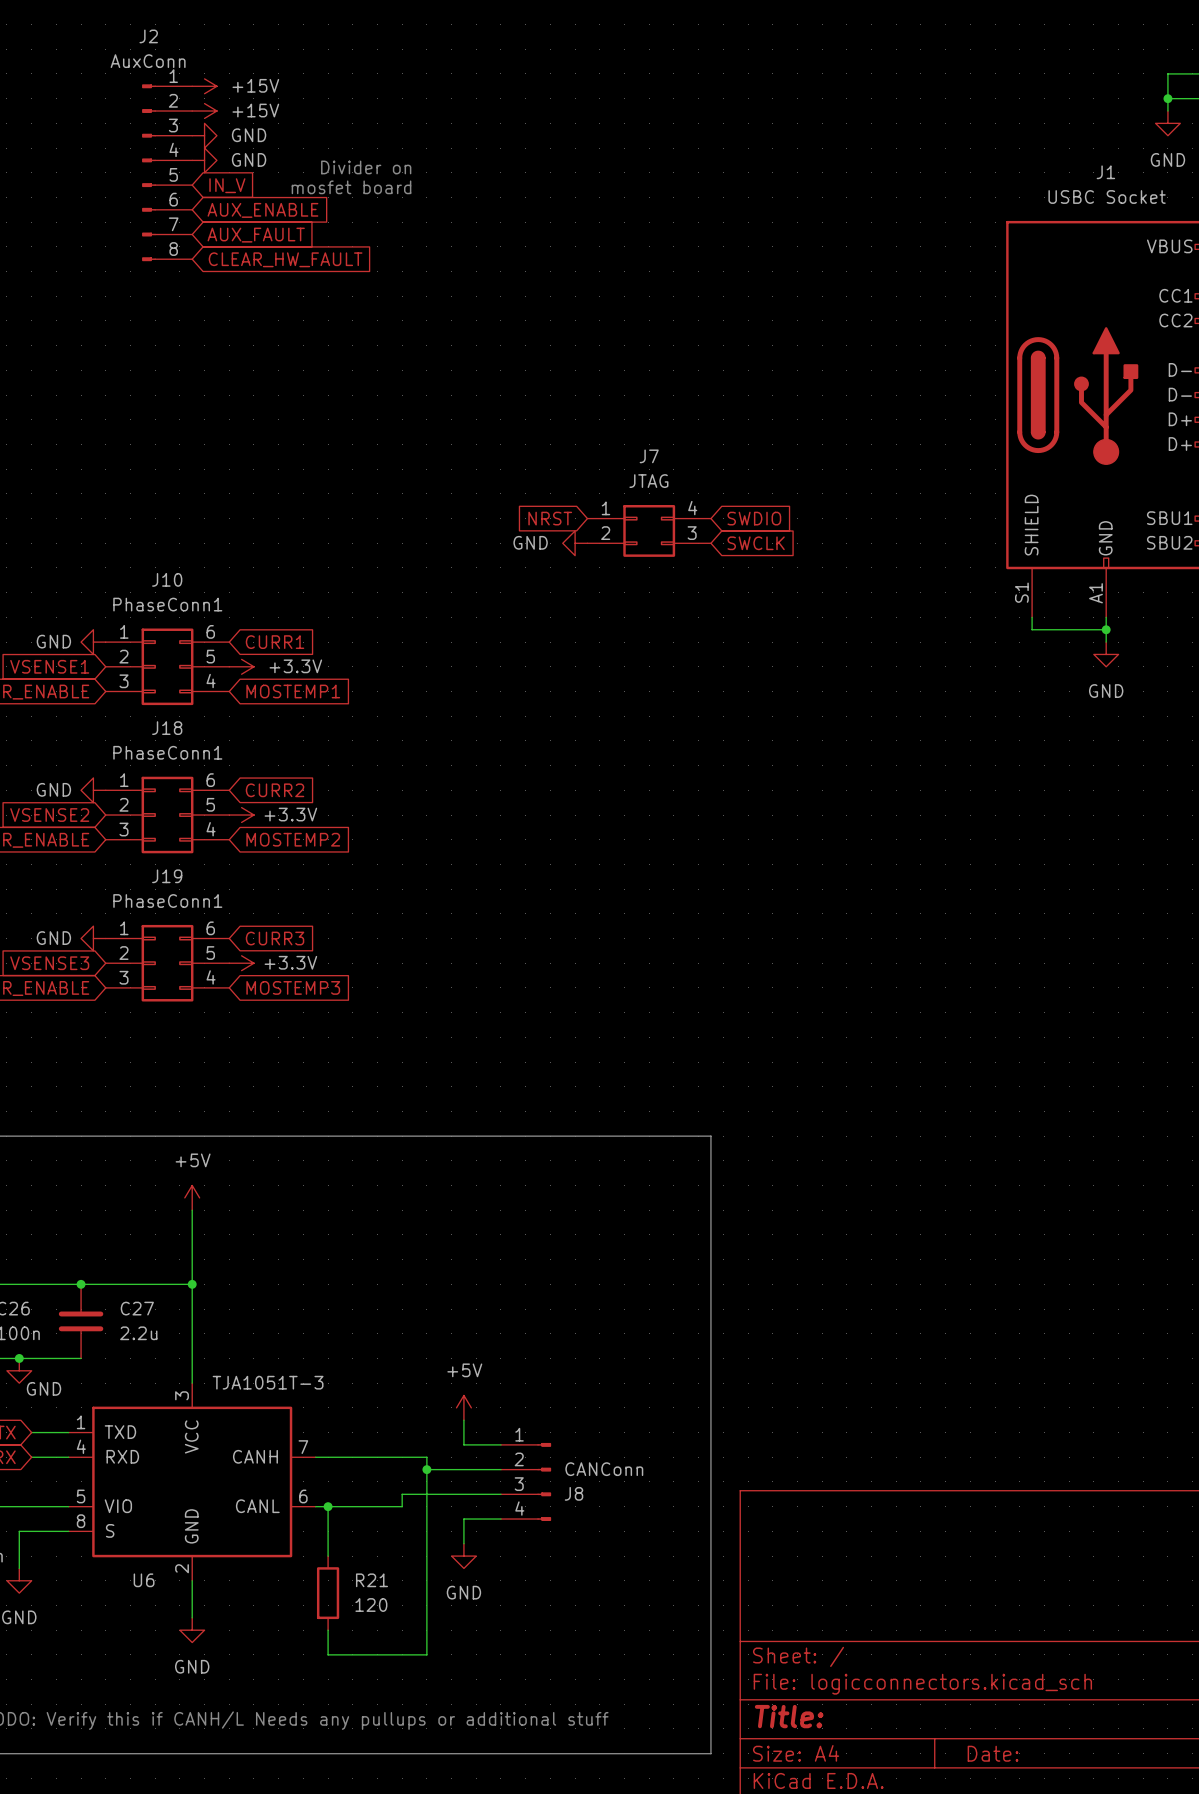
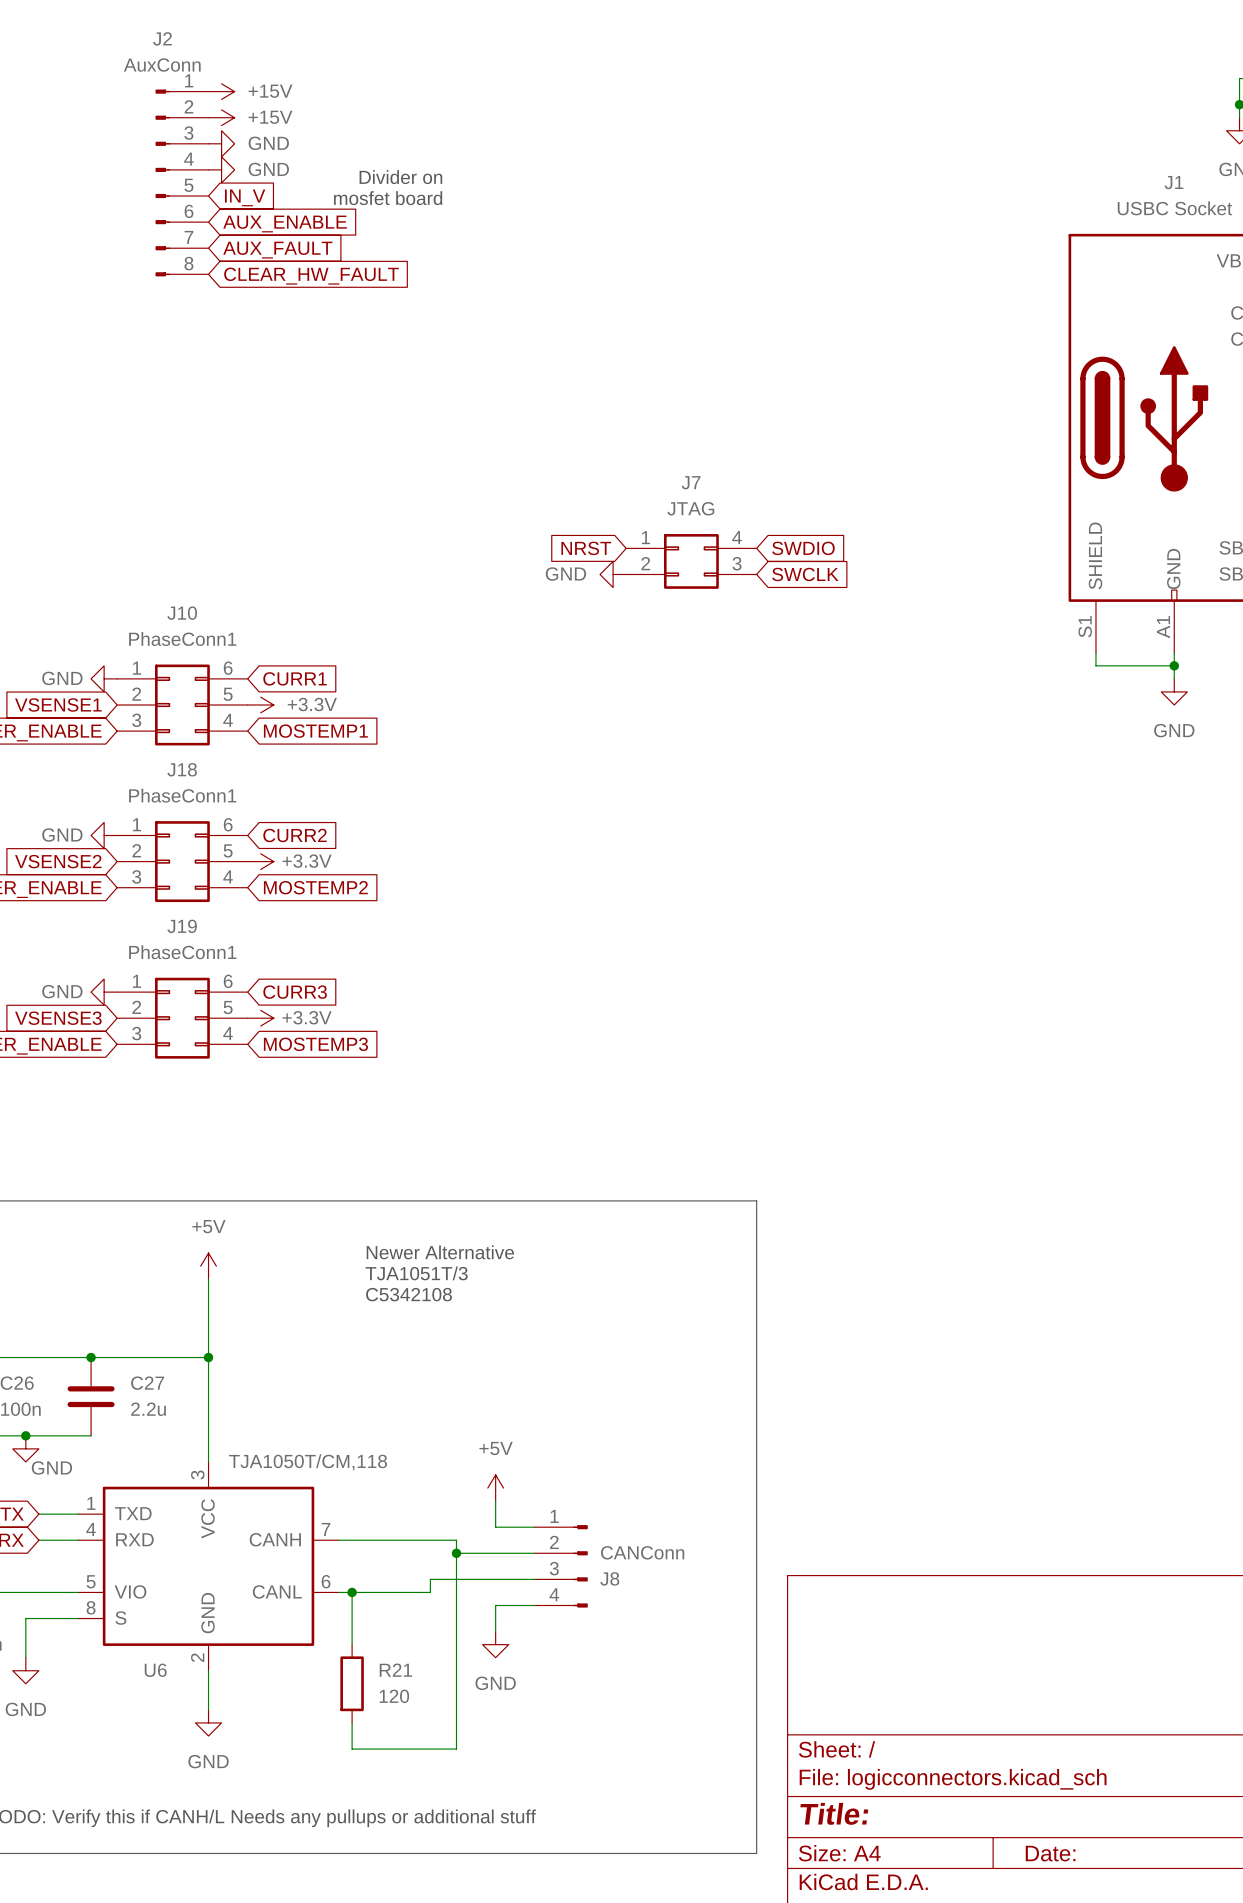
text: none -> Newer Alternative (440, 1252)
text: none -> TJA1051T/3 (416, 1273)
text: none -> C5342108 (408, 1294)
U6 value: TJA1051T-3 (268, 1382) -> TJA1050T/CM,118 (308, 1462)

